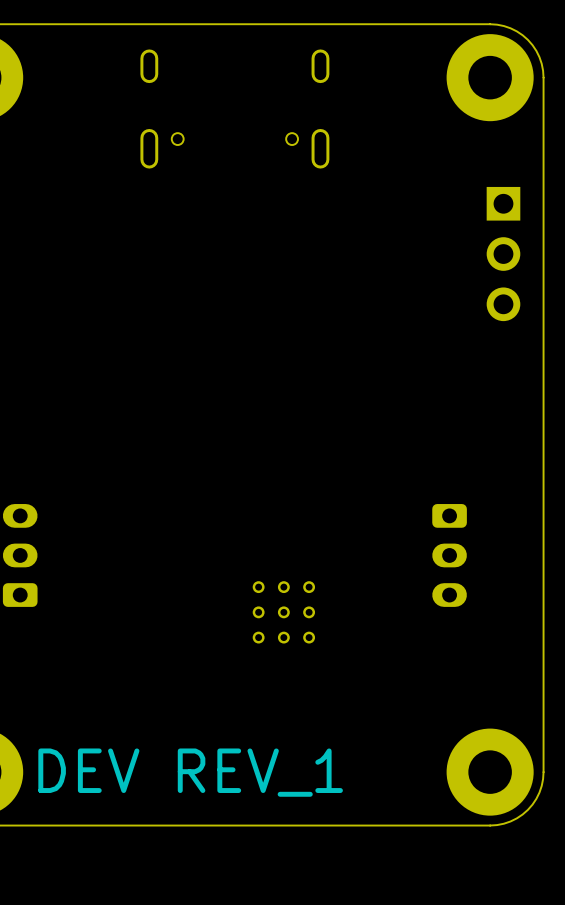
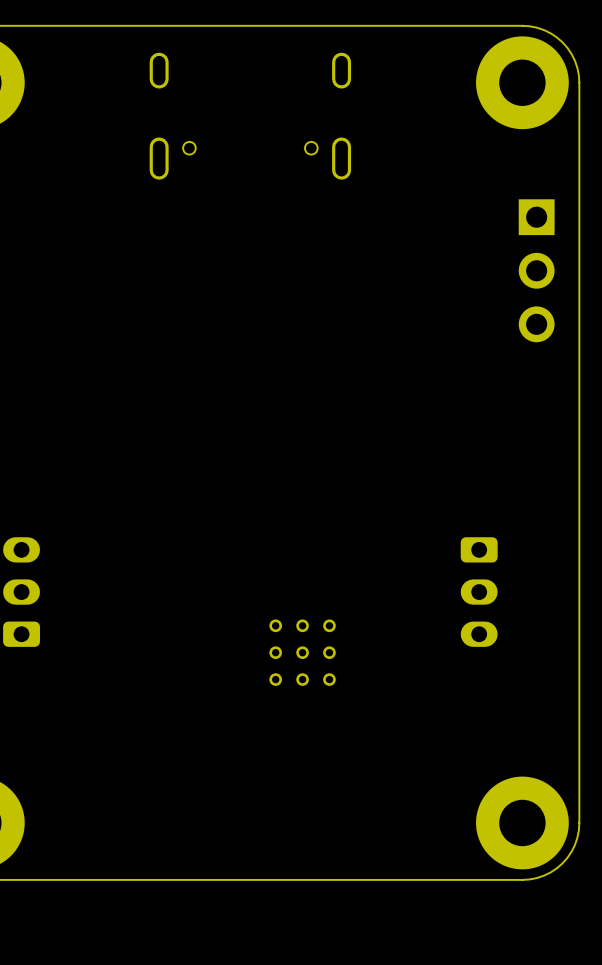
text: DEV REV_1 (190, 772) -> none

